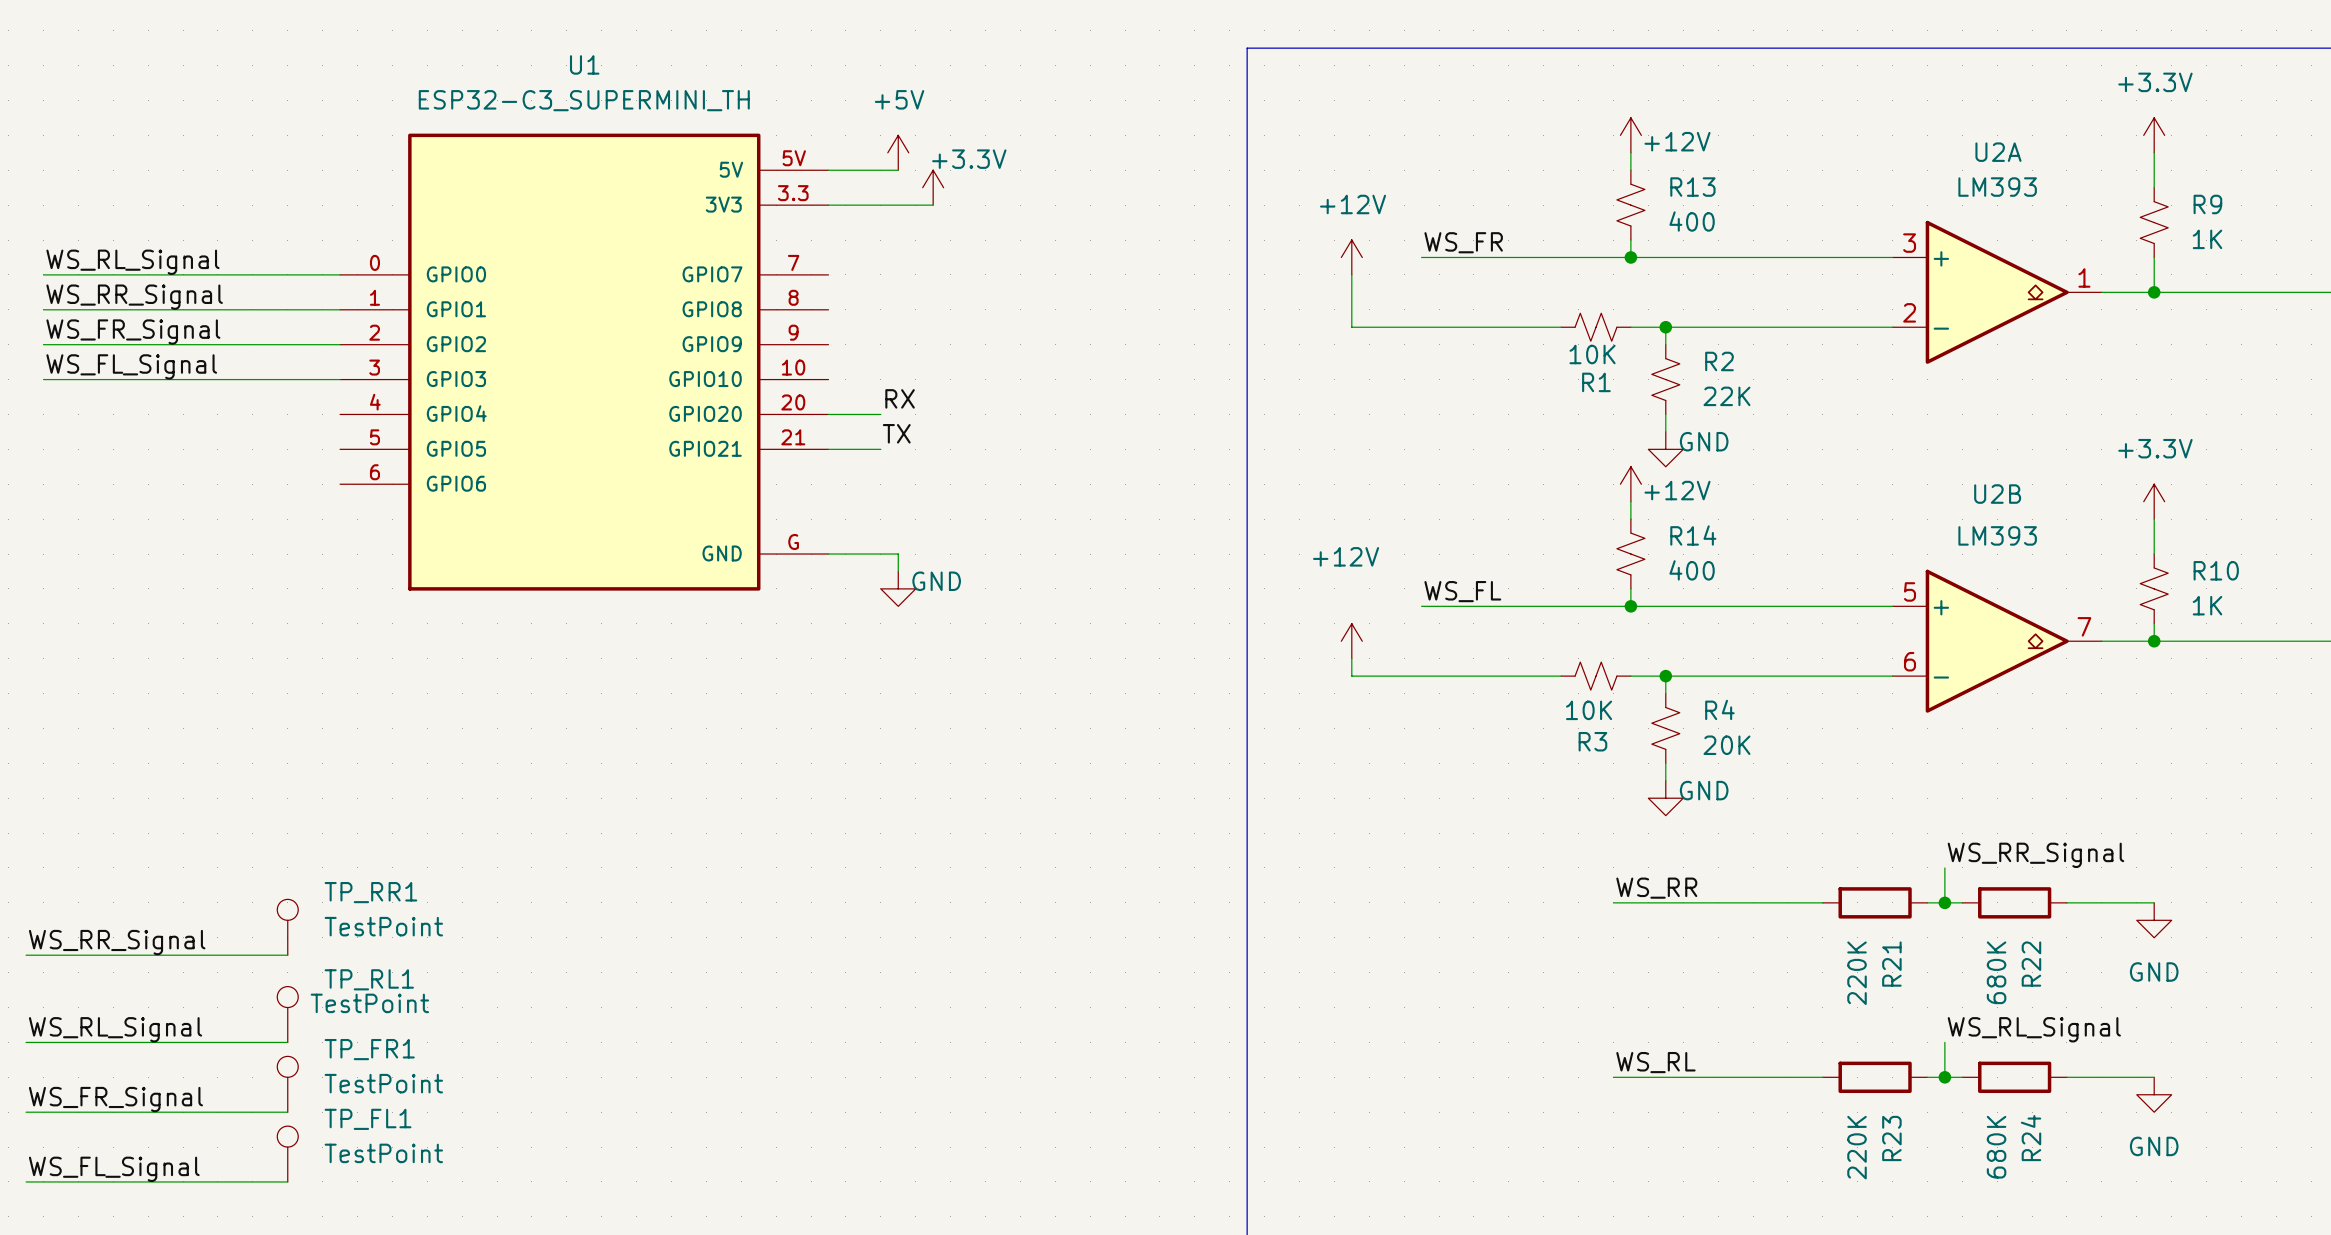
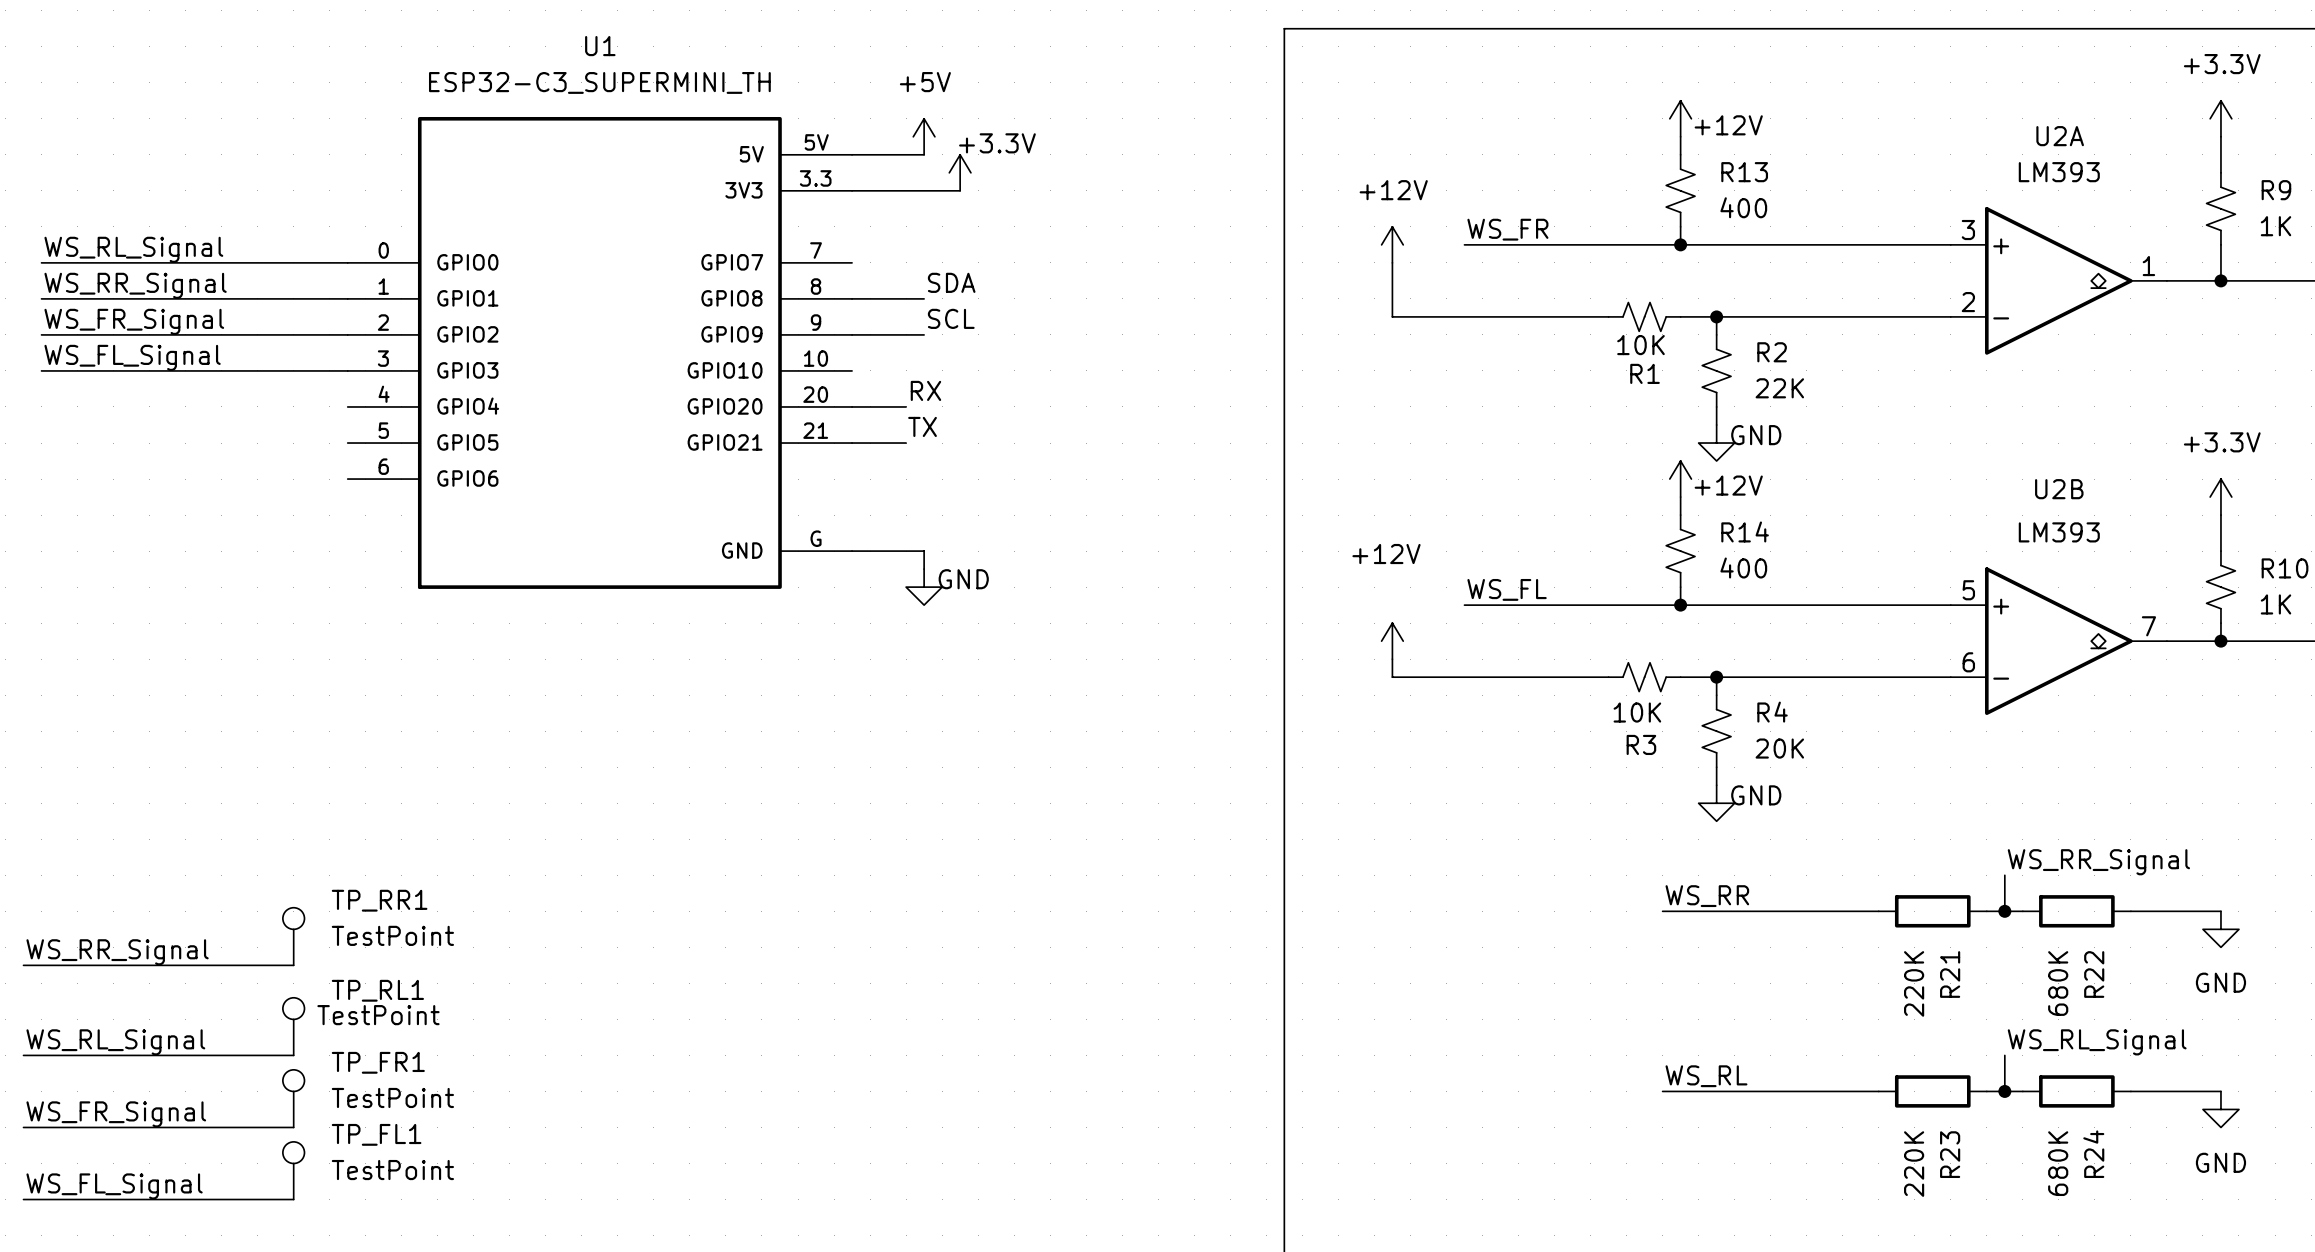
label: none -> SDA (951, 282)
wire: none -> (852, 298) (924, 298)
label: none -> SCL (951, 318)
wire: none -> (852, 334) (924, 334)

